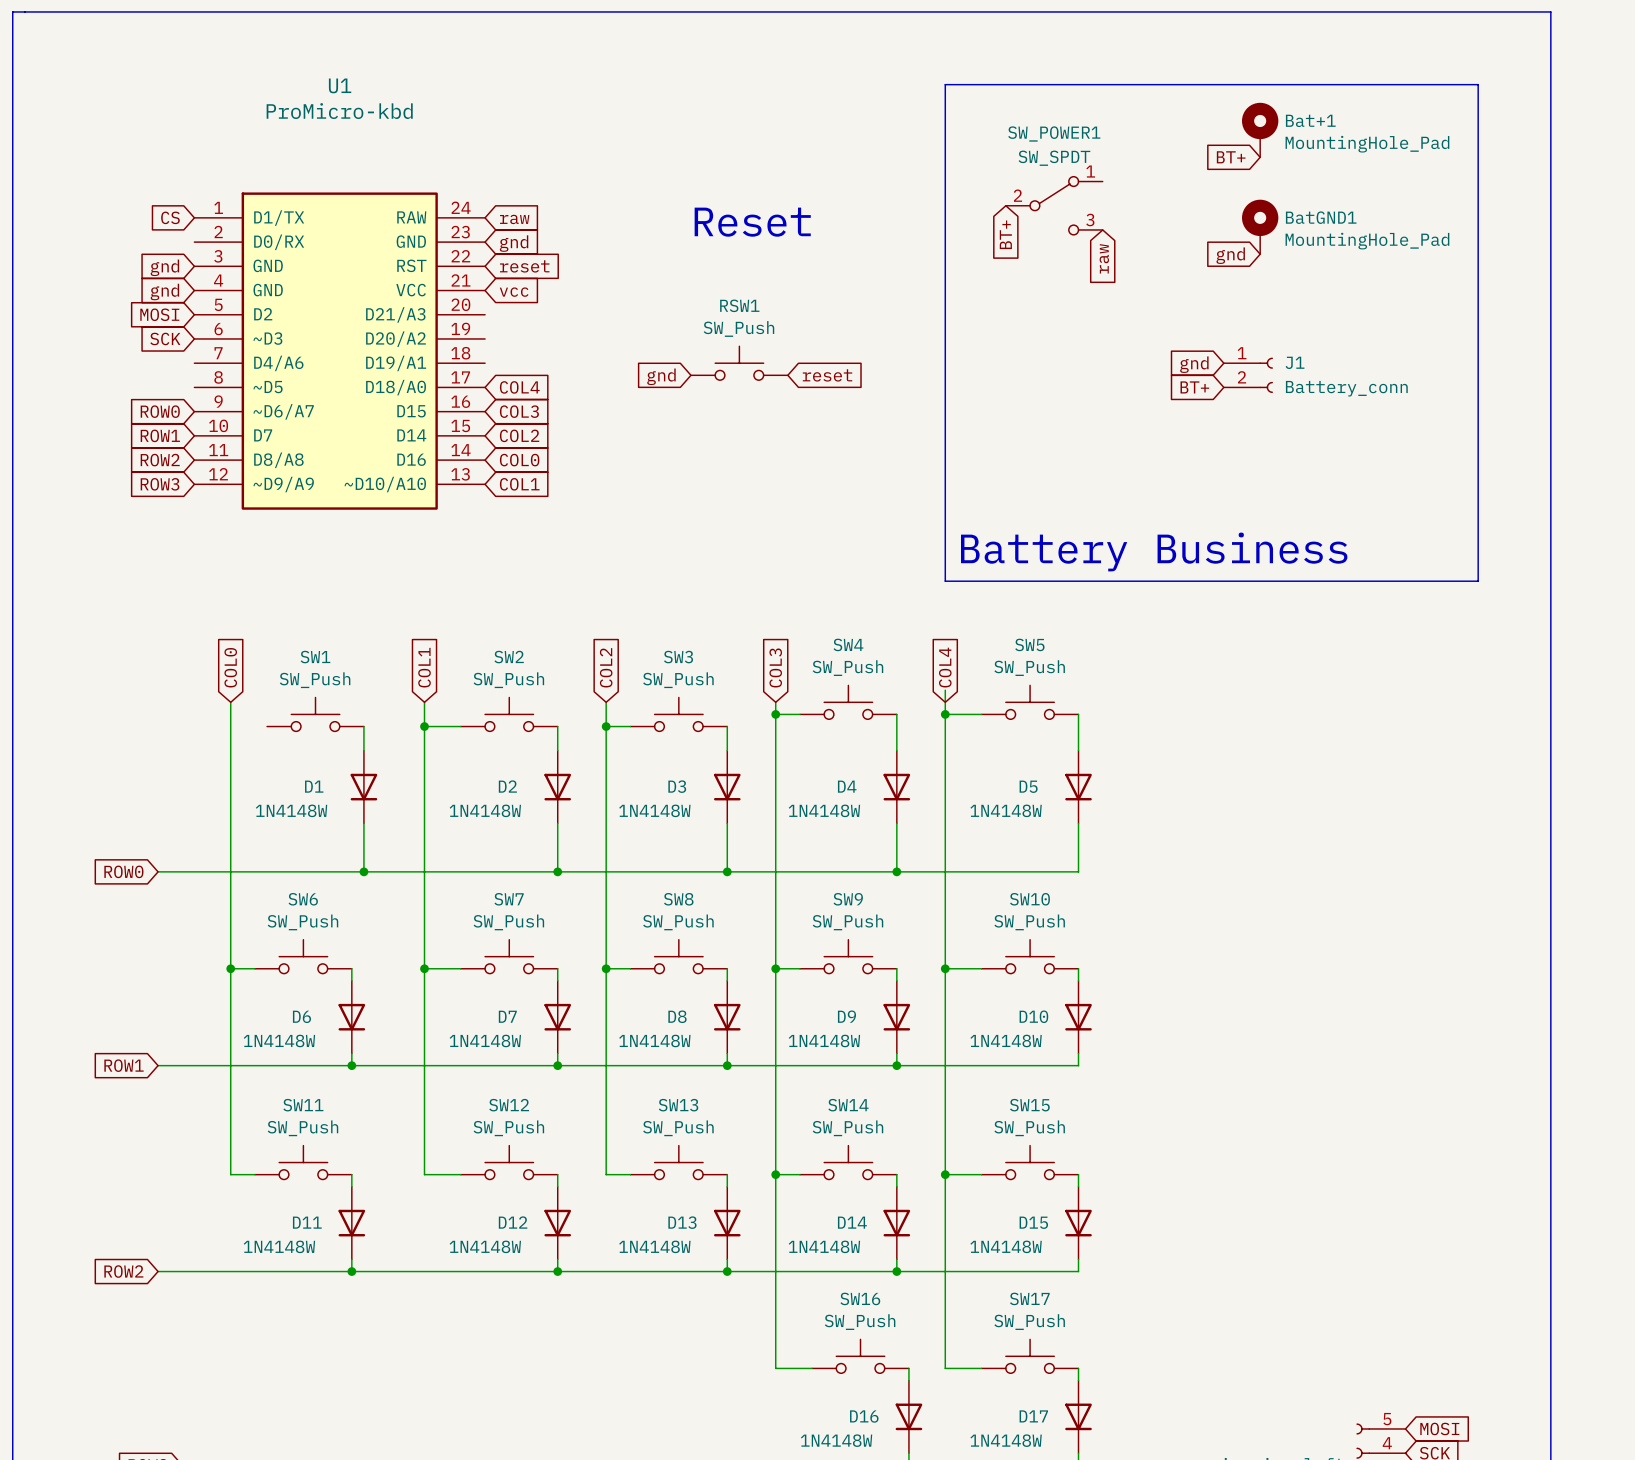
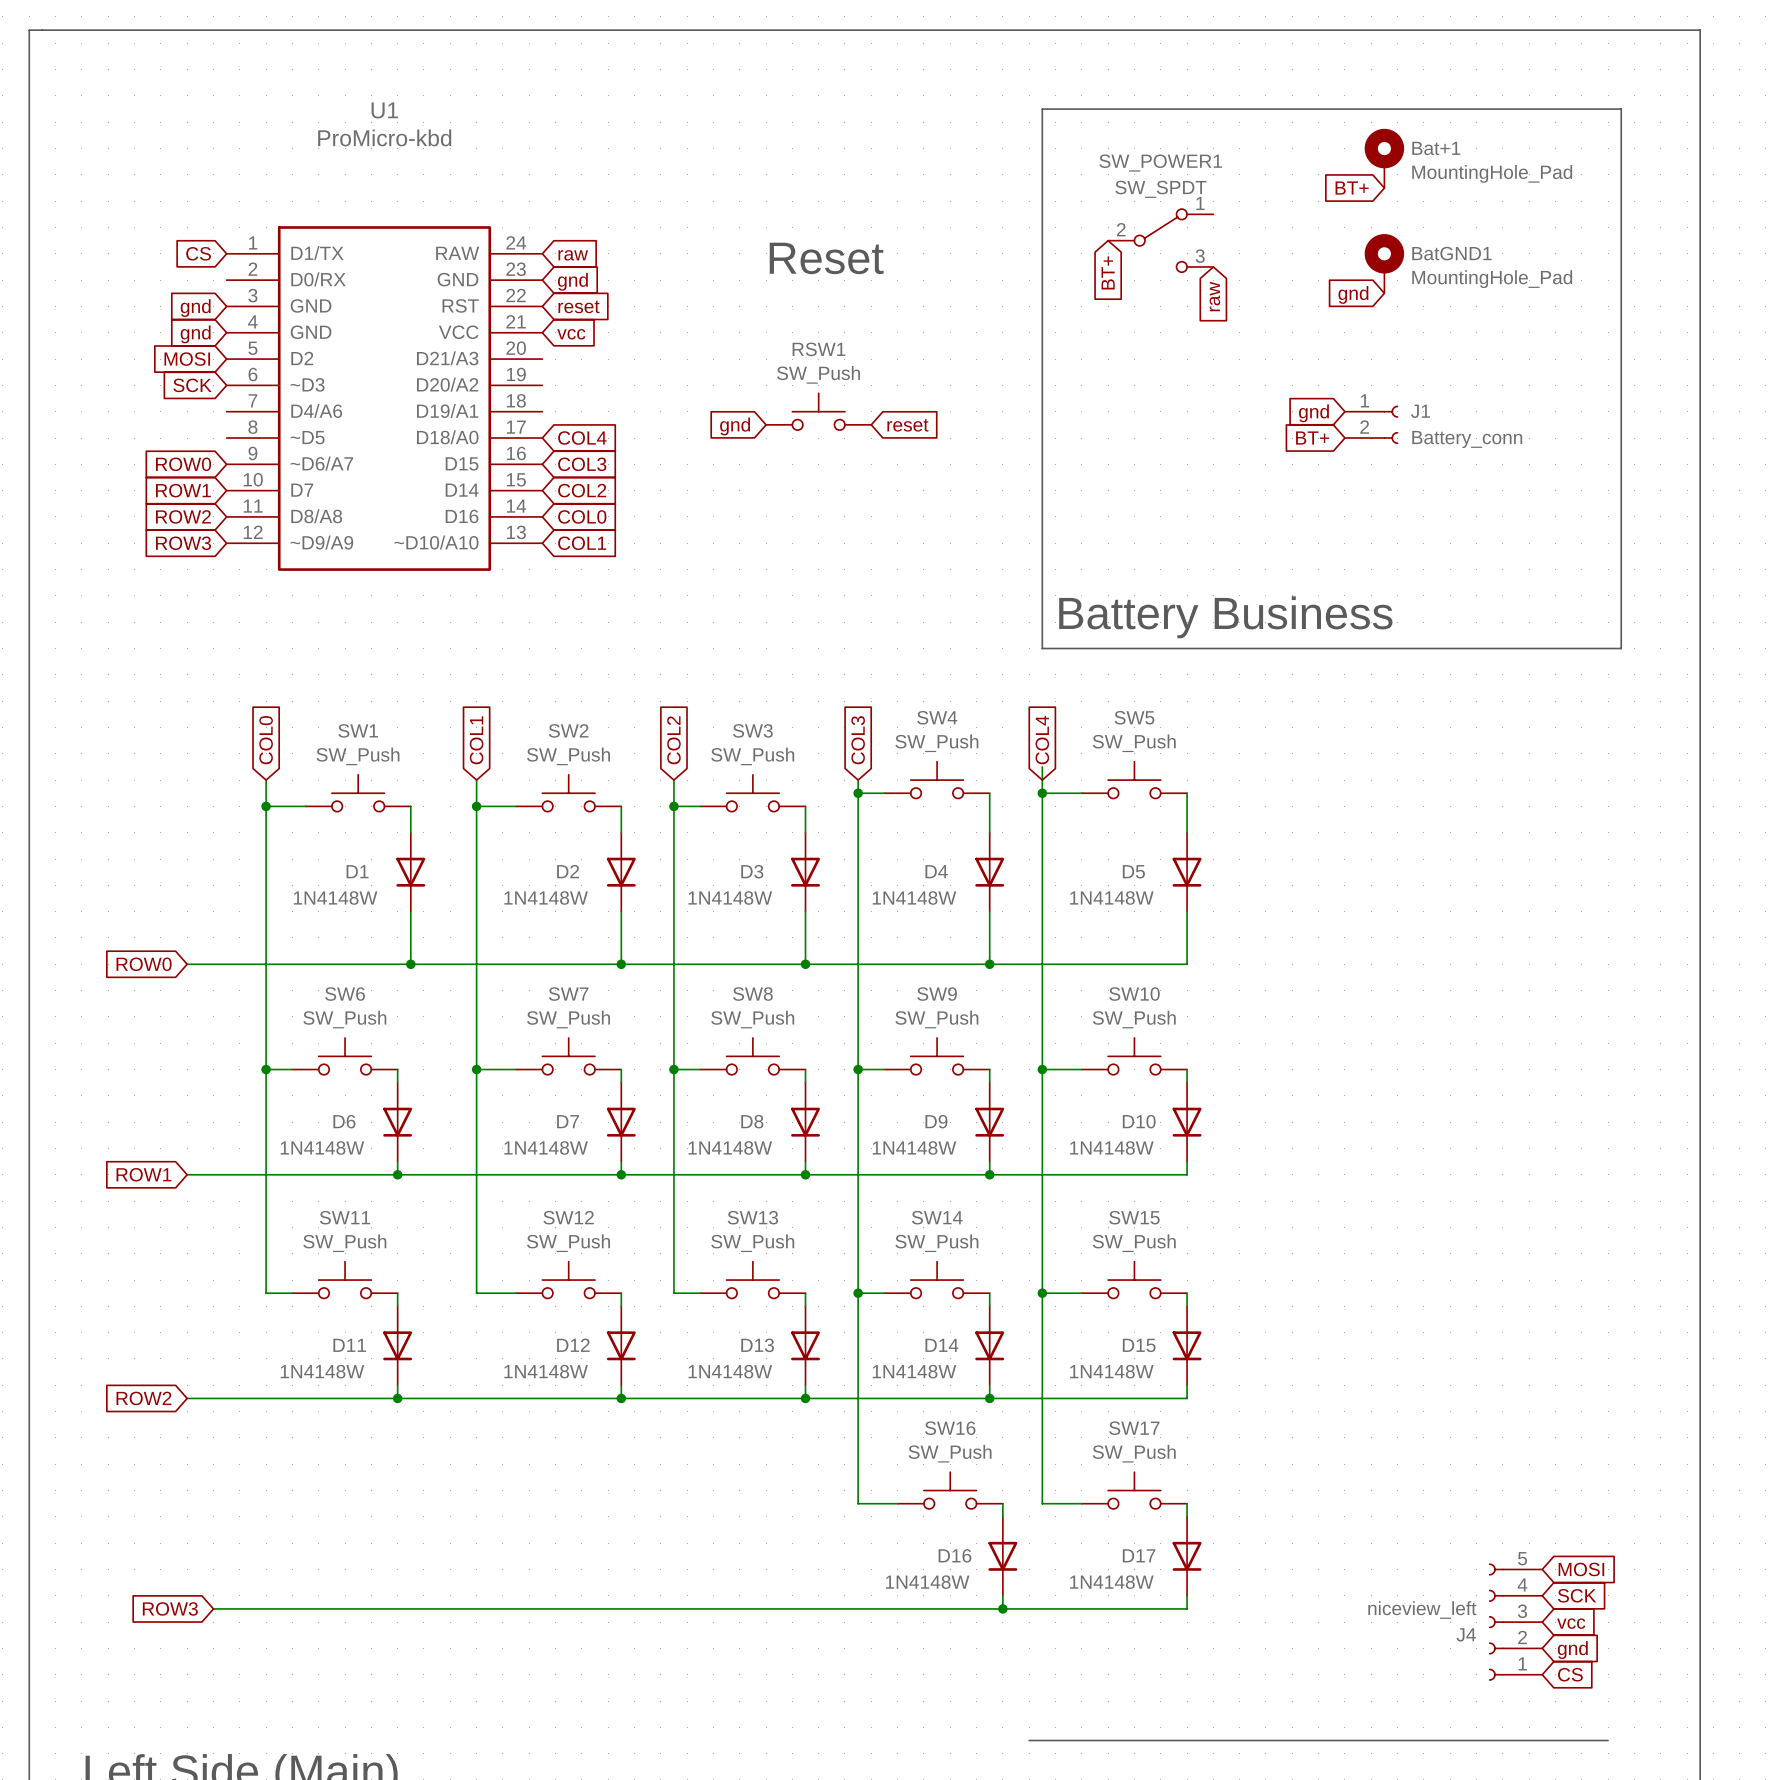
wire: none -> (266, 806) (305, 806)
junction: none -> (266, 806)

